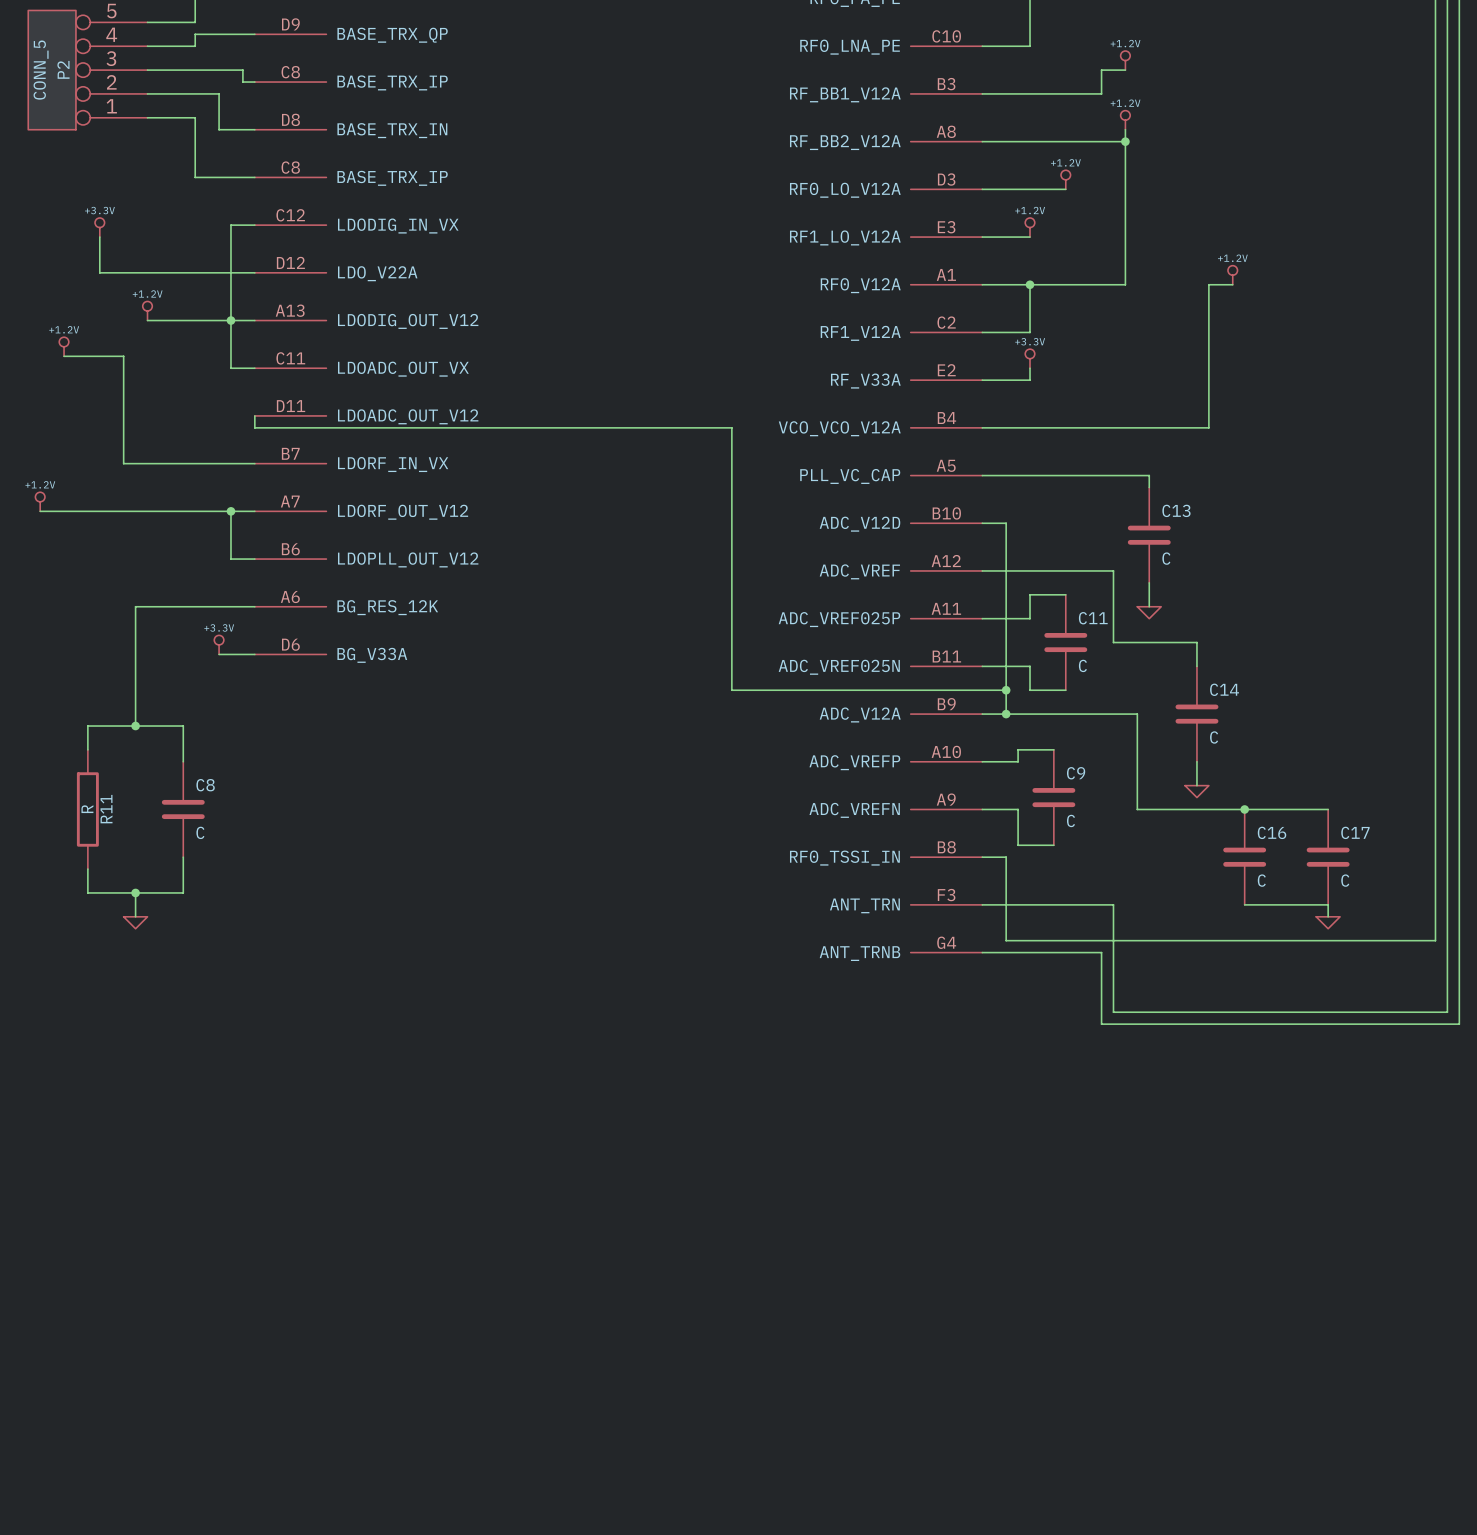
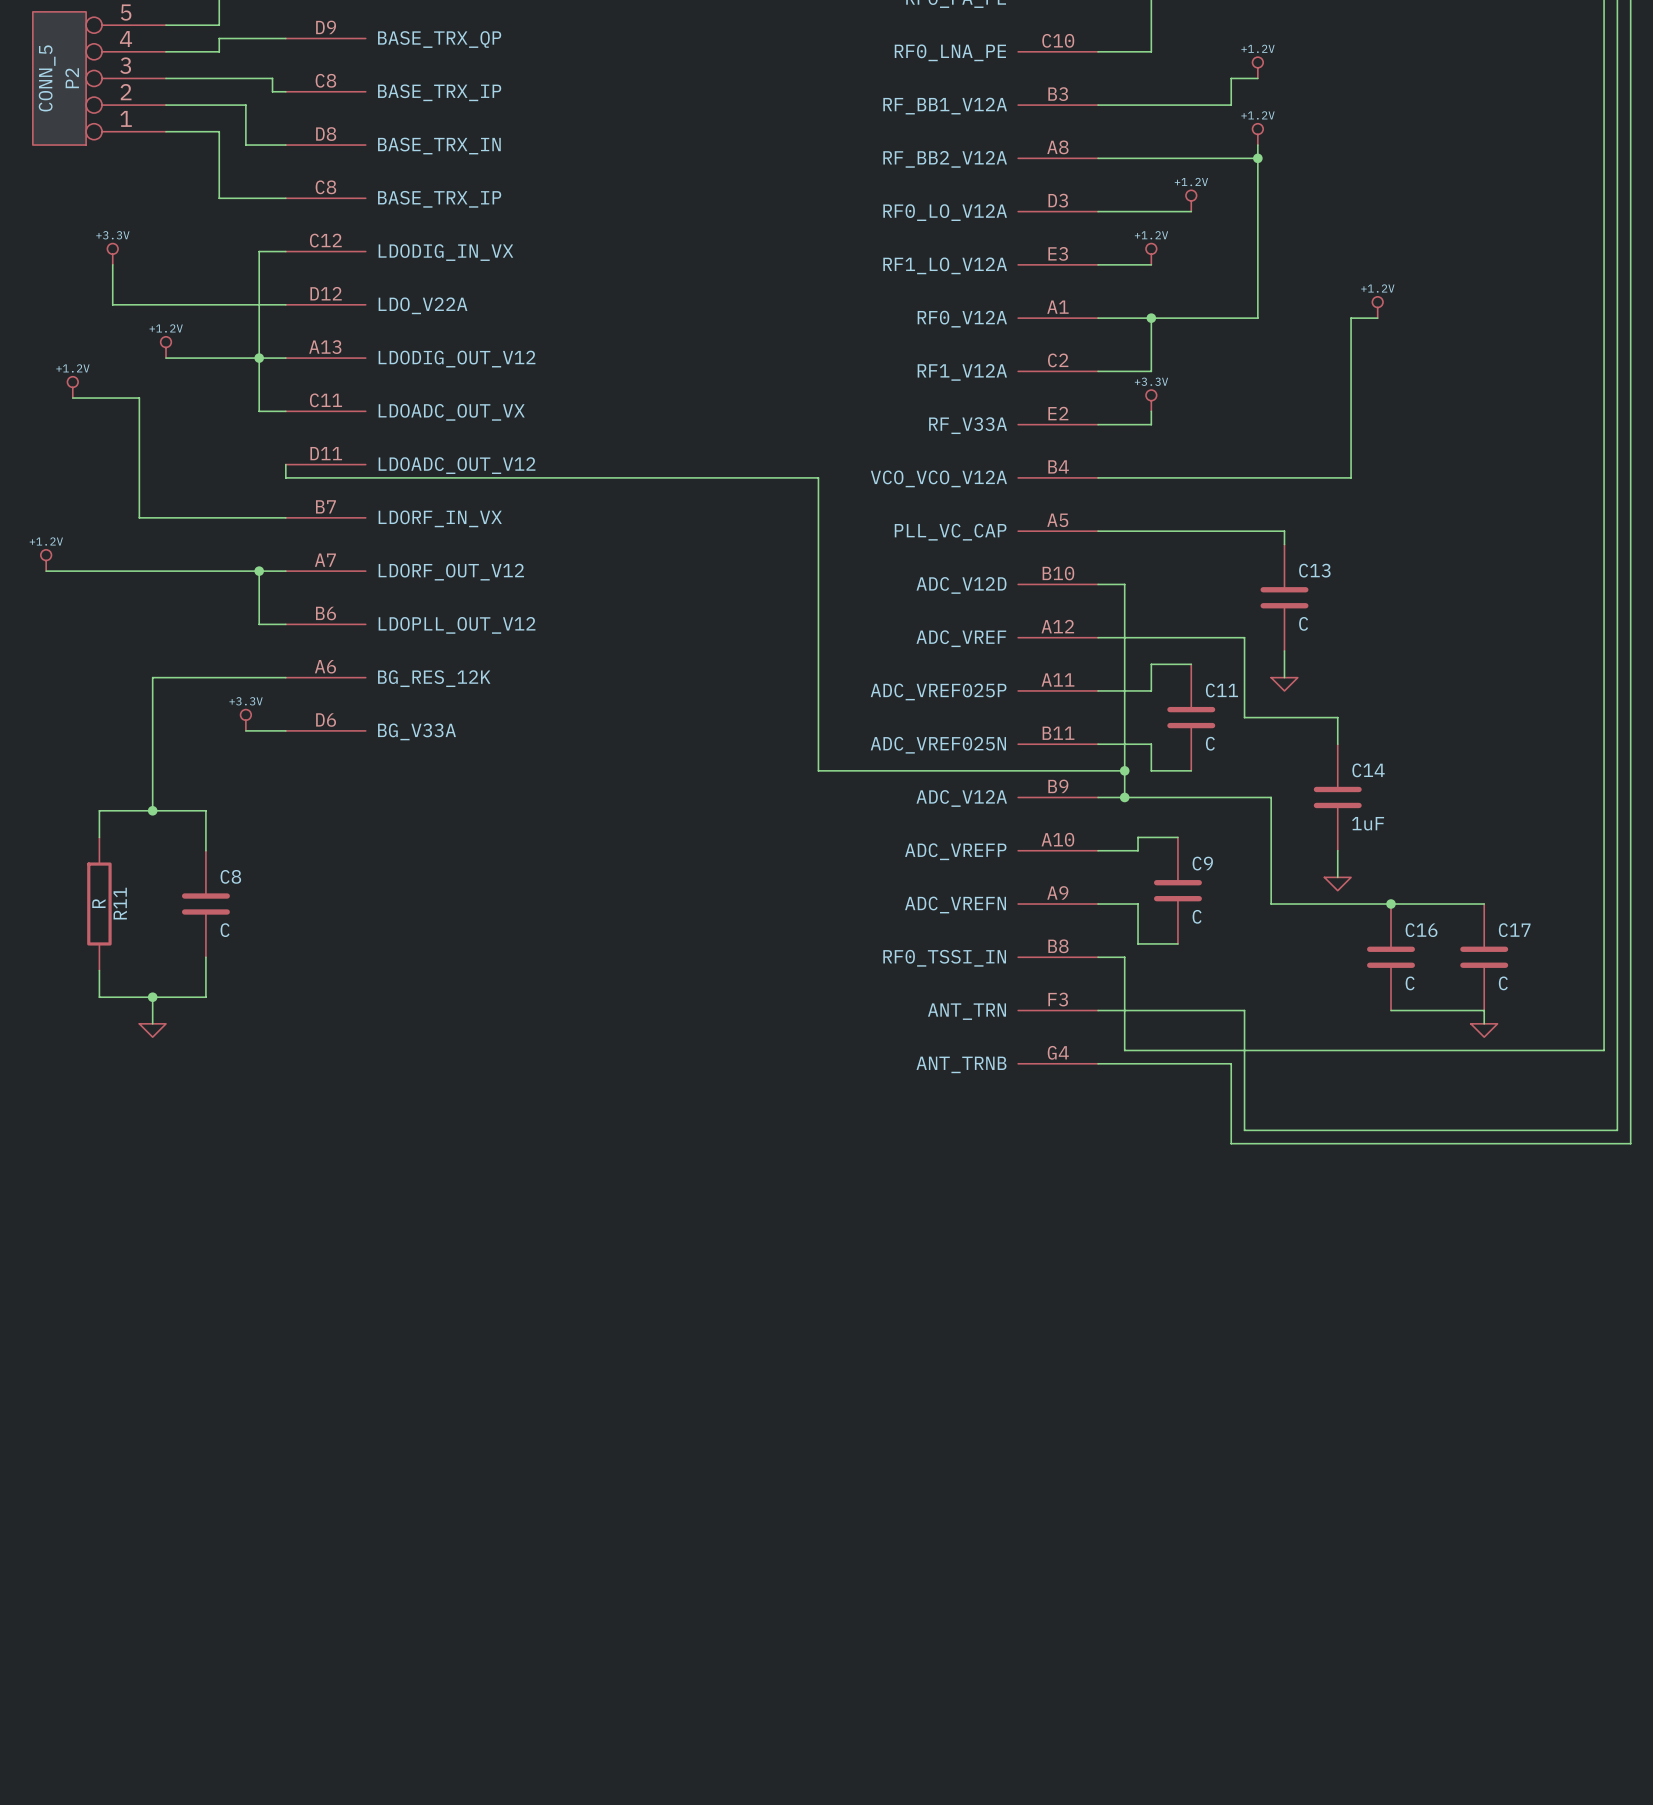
C14 value: C (1214, 737) -> 1uF (1368, 823)

